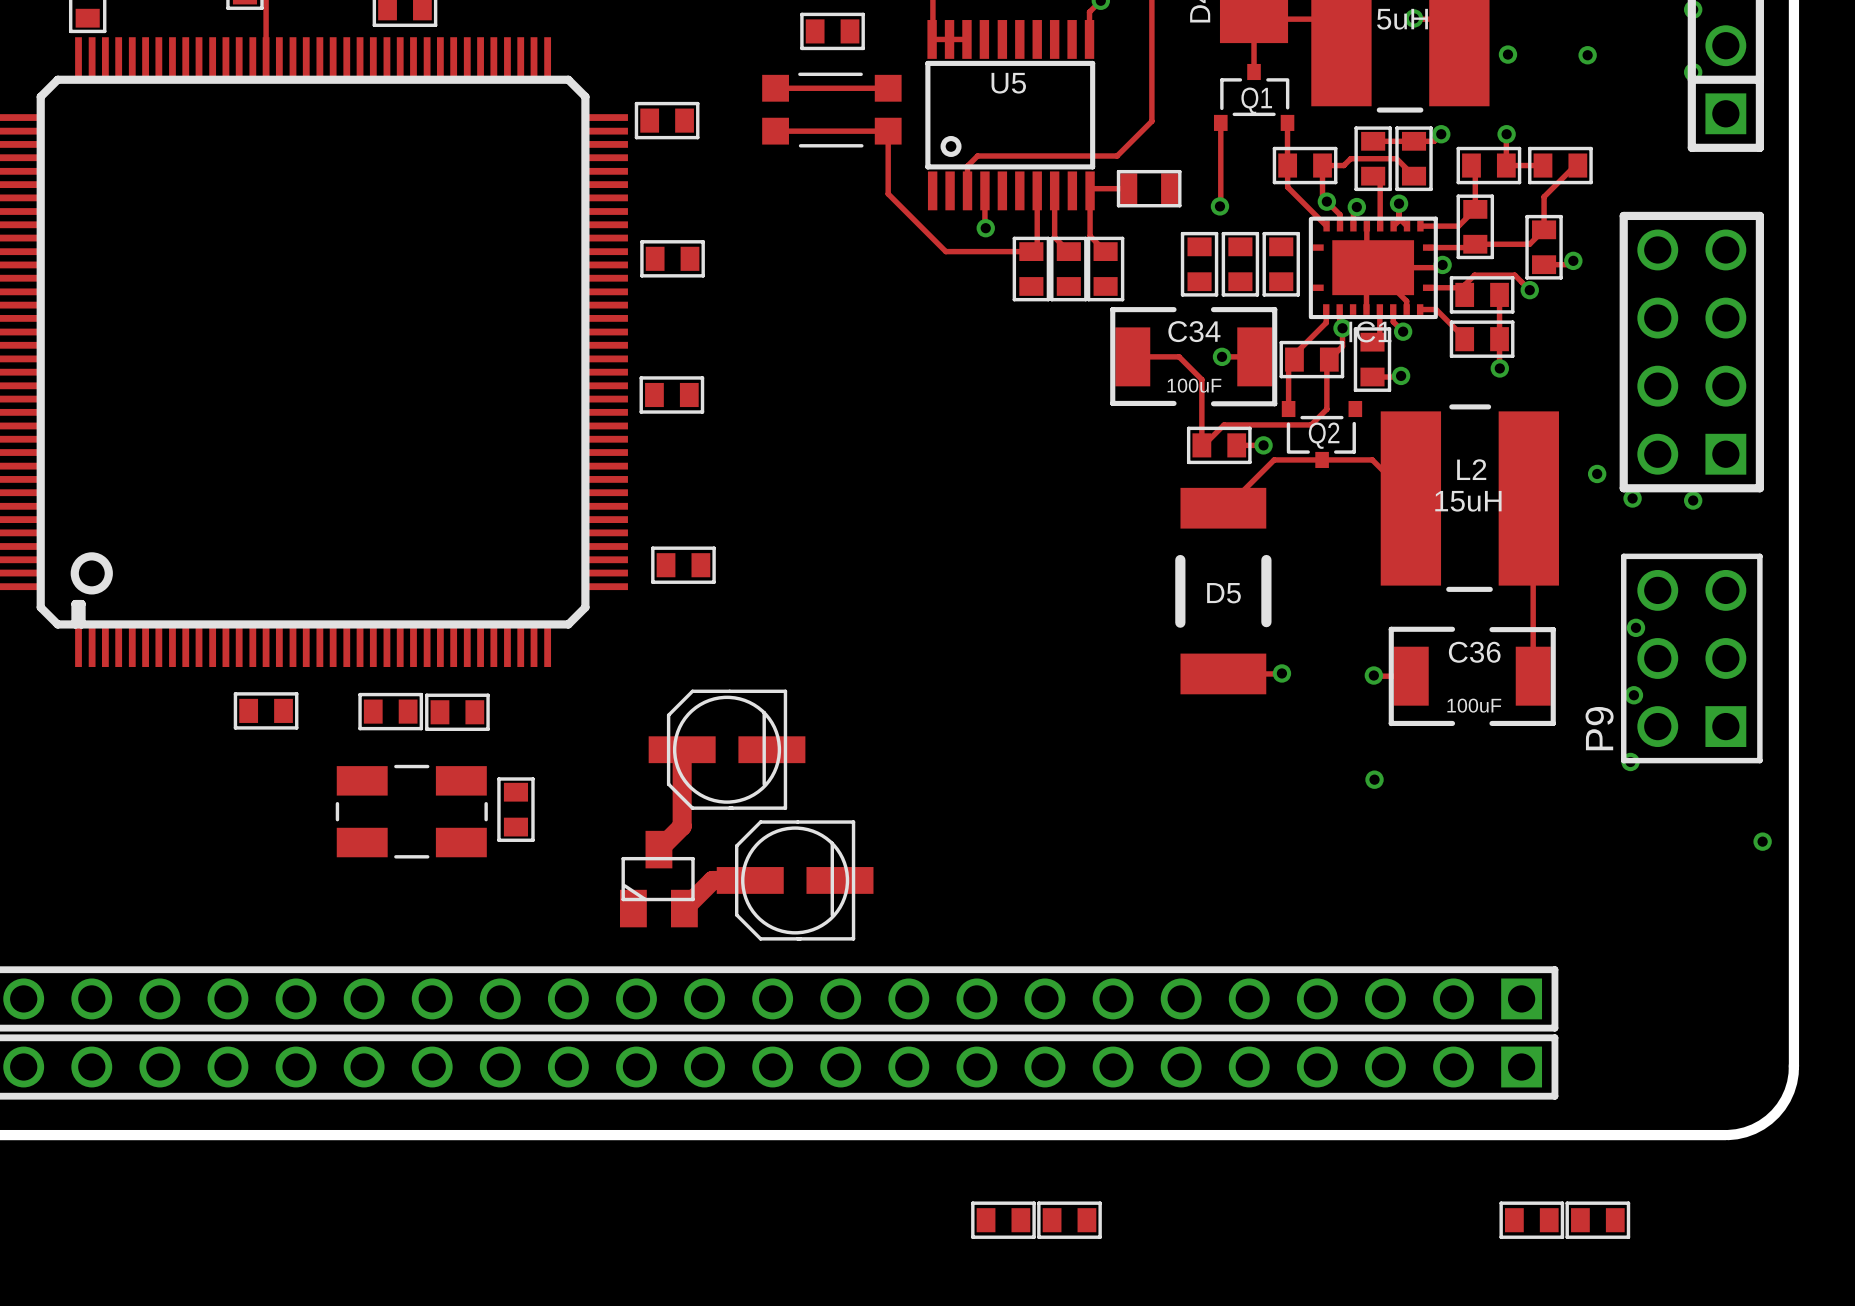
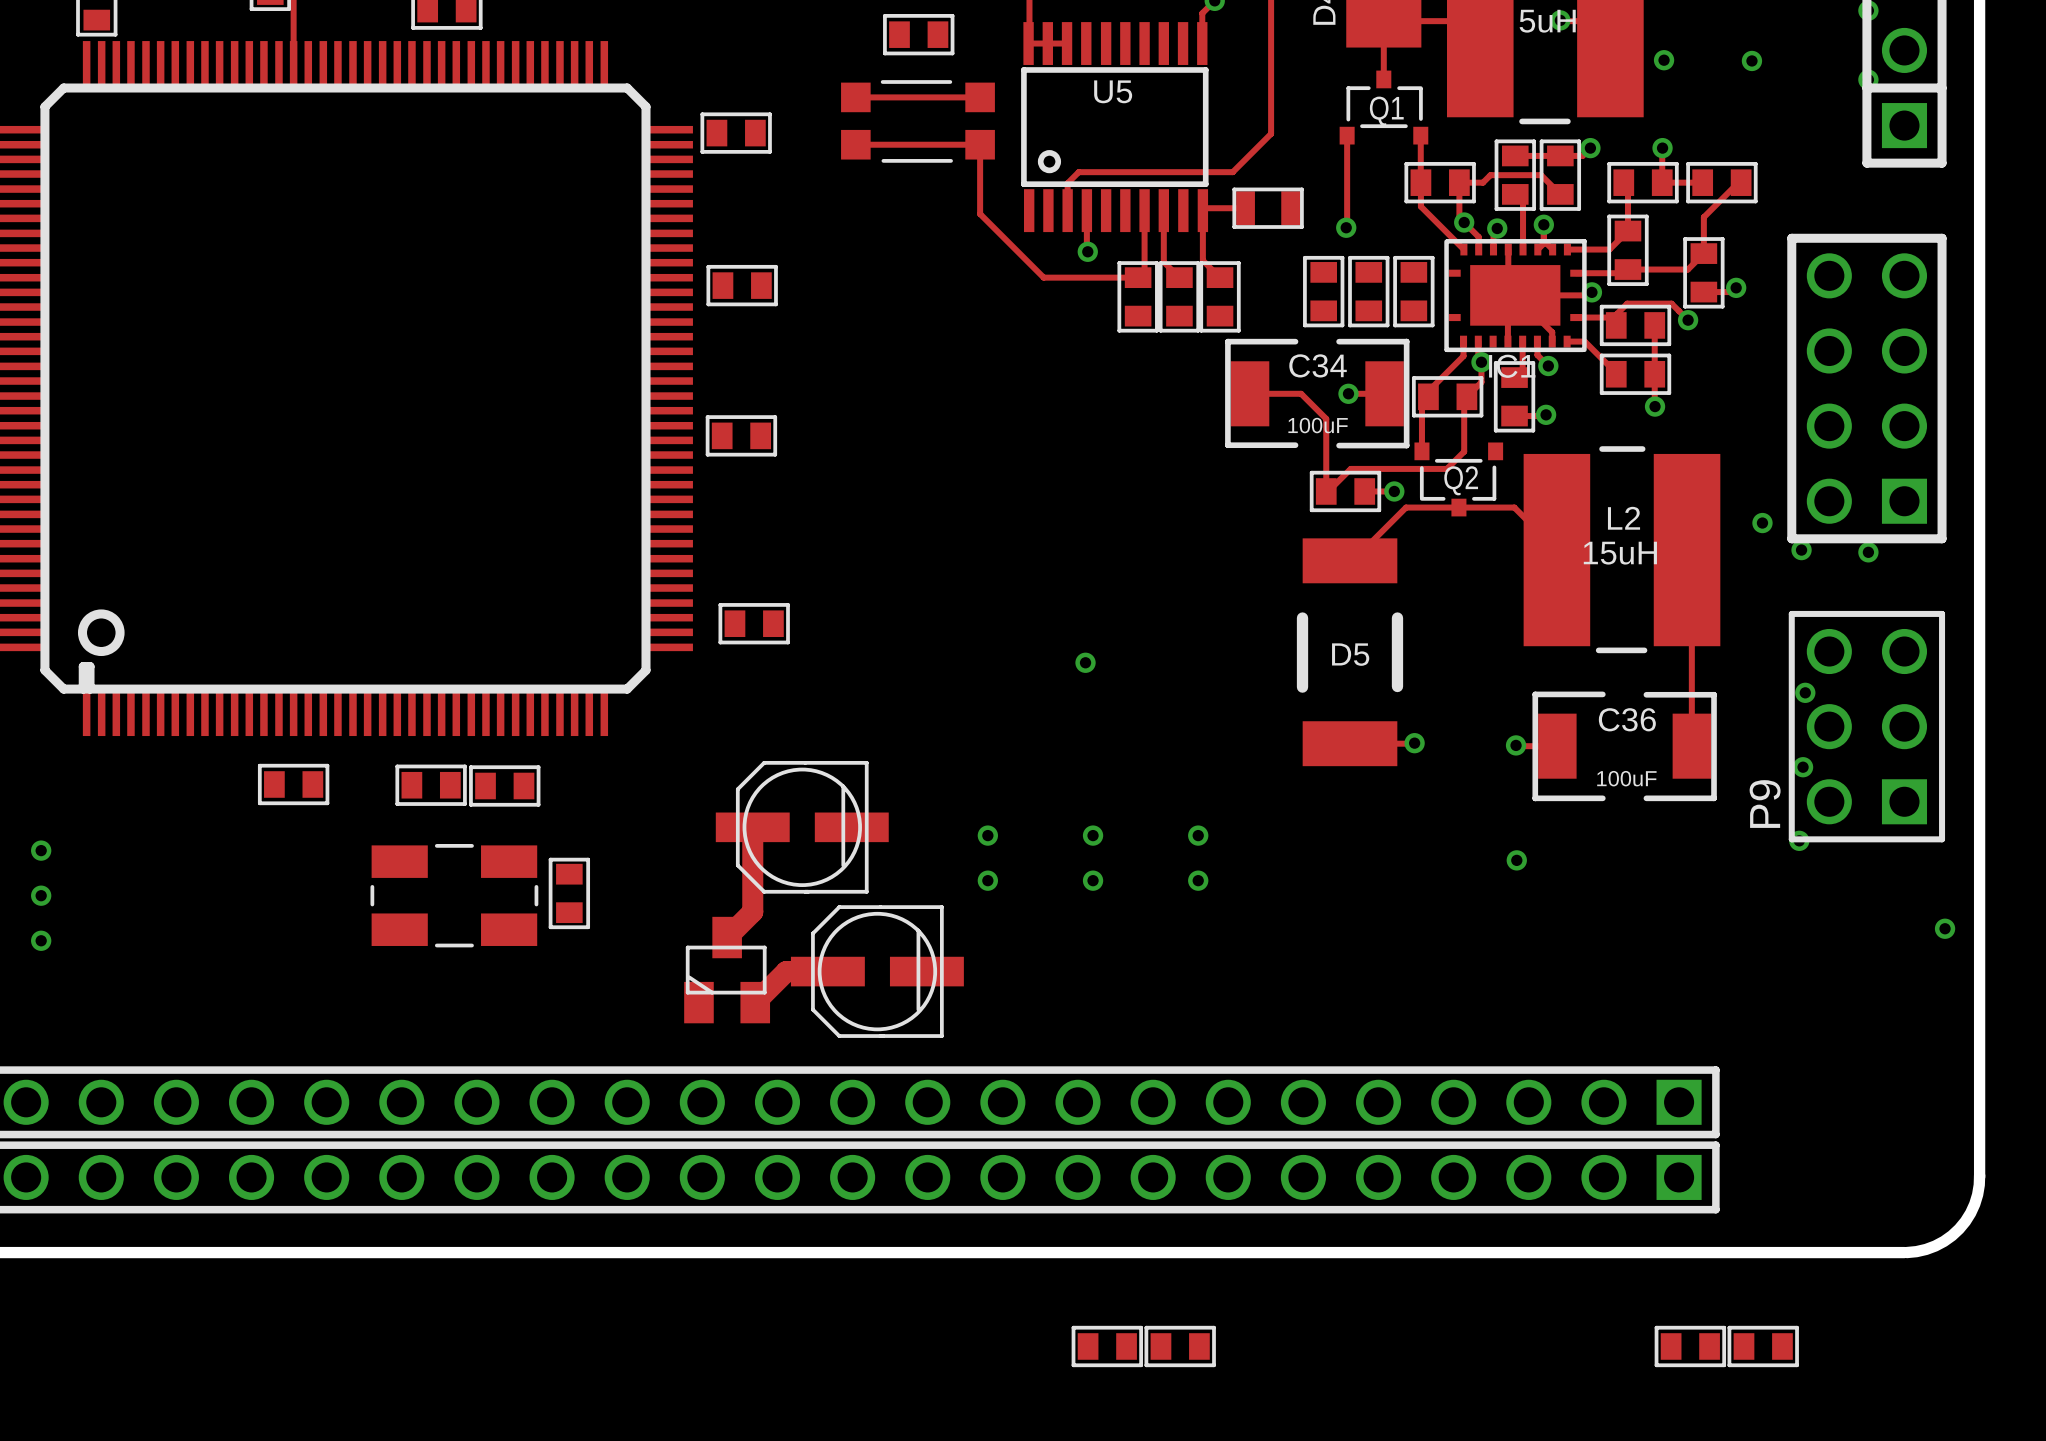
via: none -> (1085, 662)
via: none -> (987, 835)
via: none -> (1093, 835)
via: none -> (1198, 835)
via: none -> (41, 850)
via: none -> (987, 880)
via: none -> (1093, 880)
via: none -> (1198, 880)
via: none -> (41, 895)
via: none -> (41, 940)

